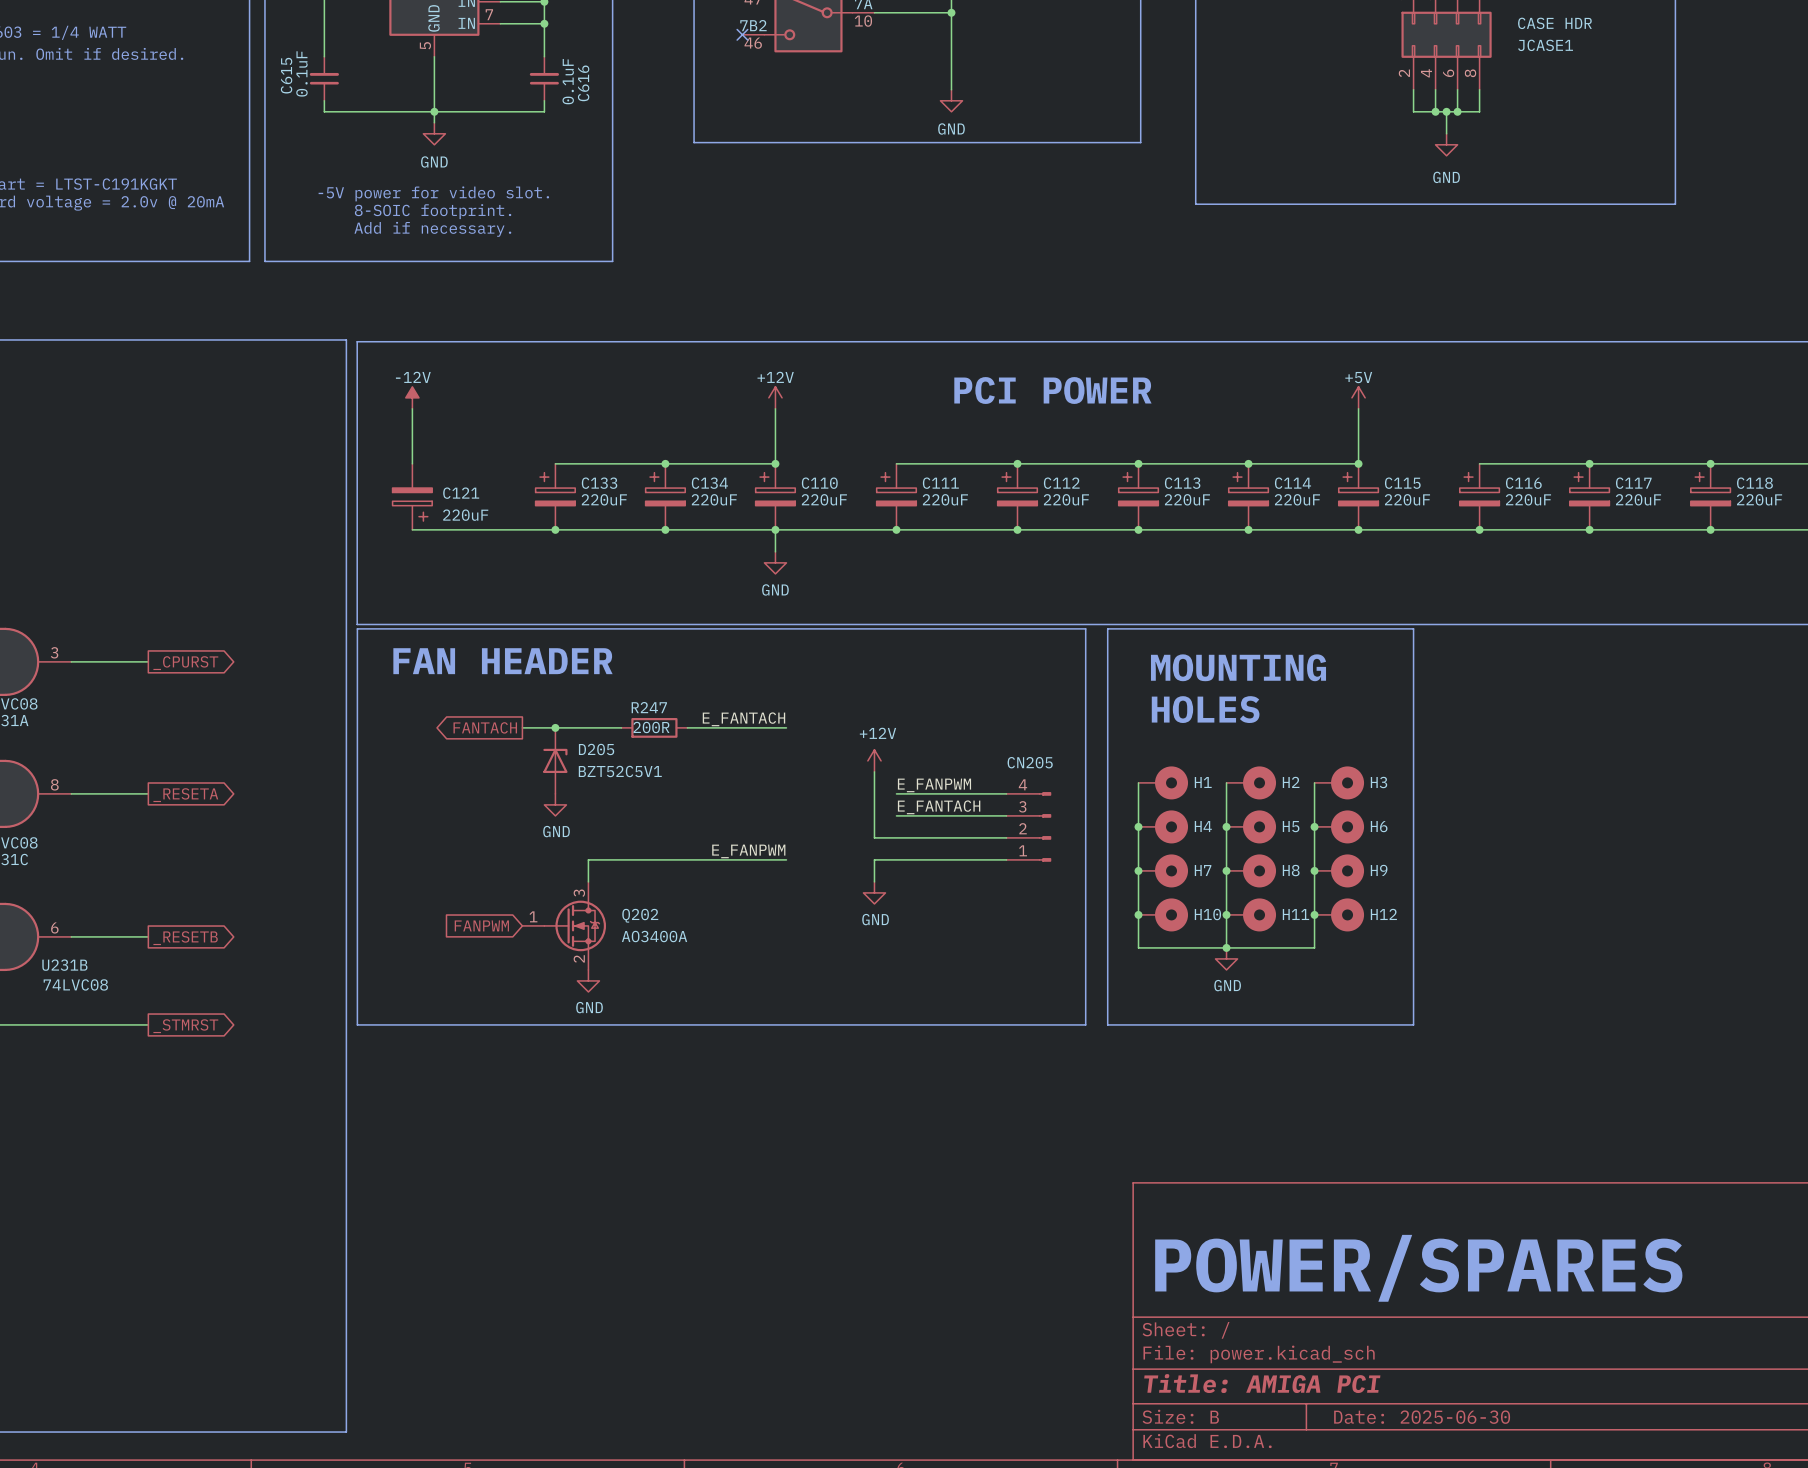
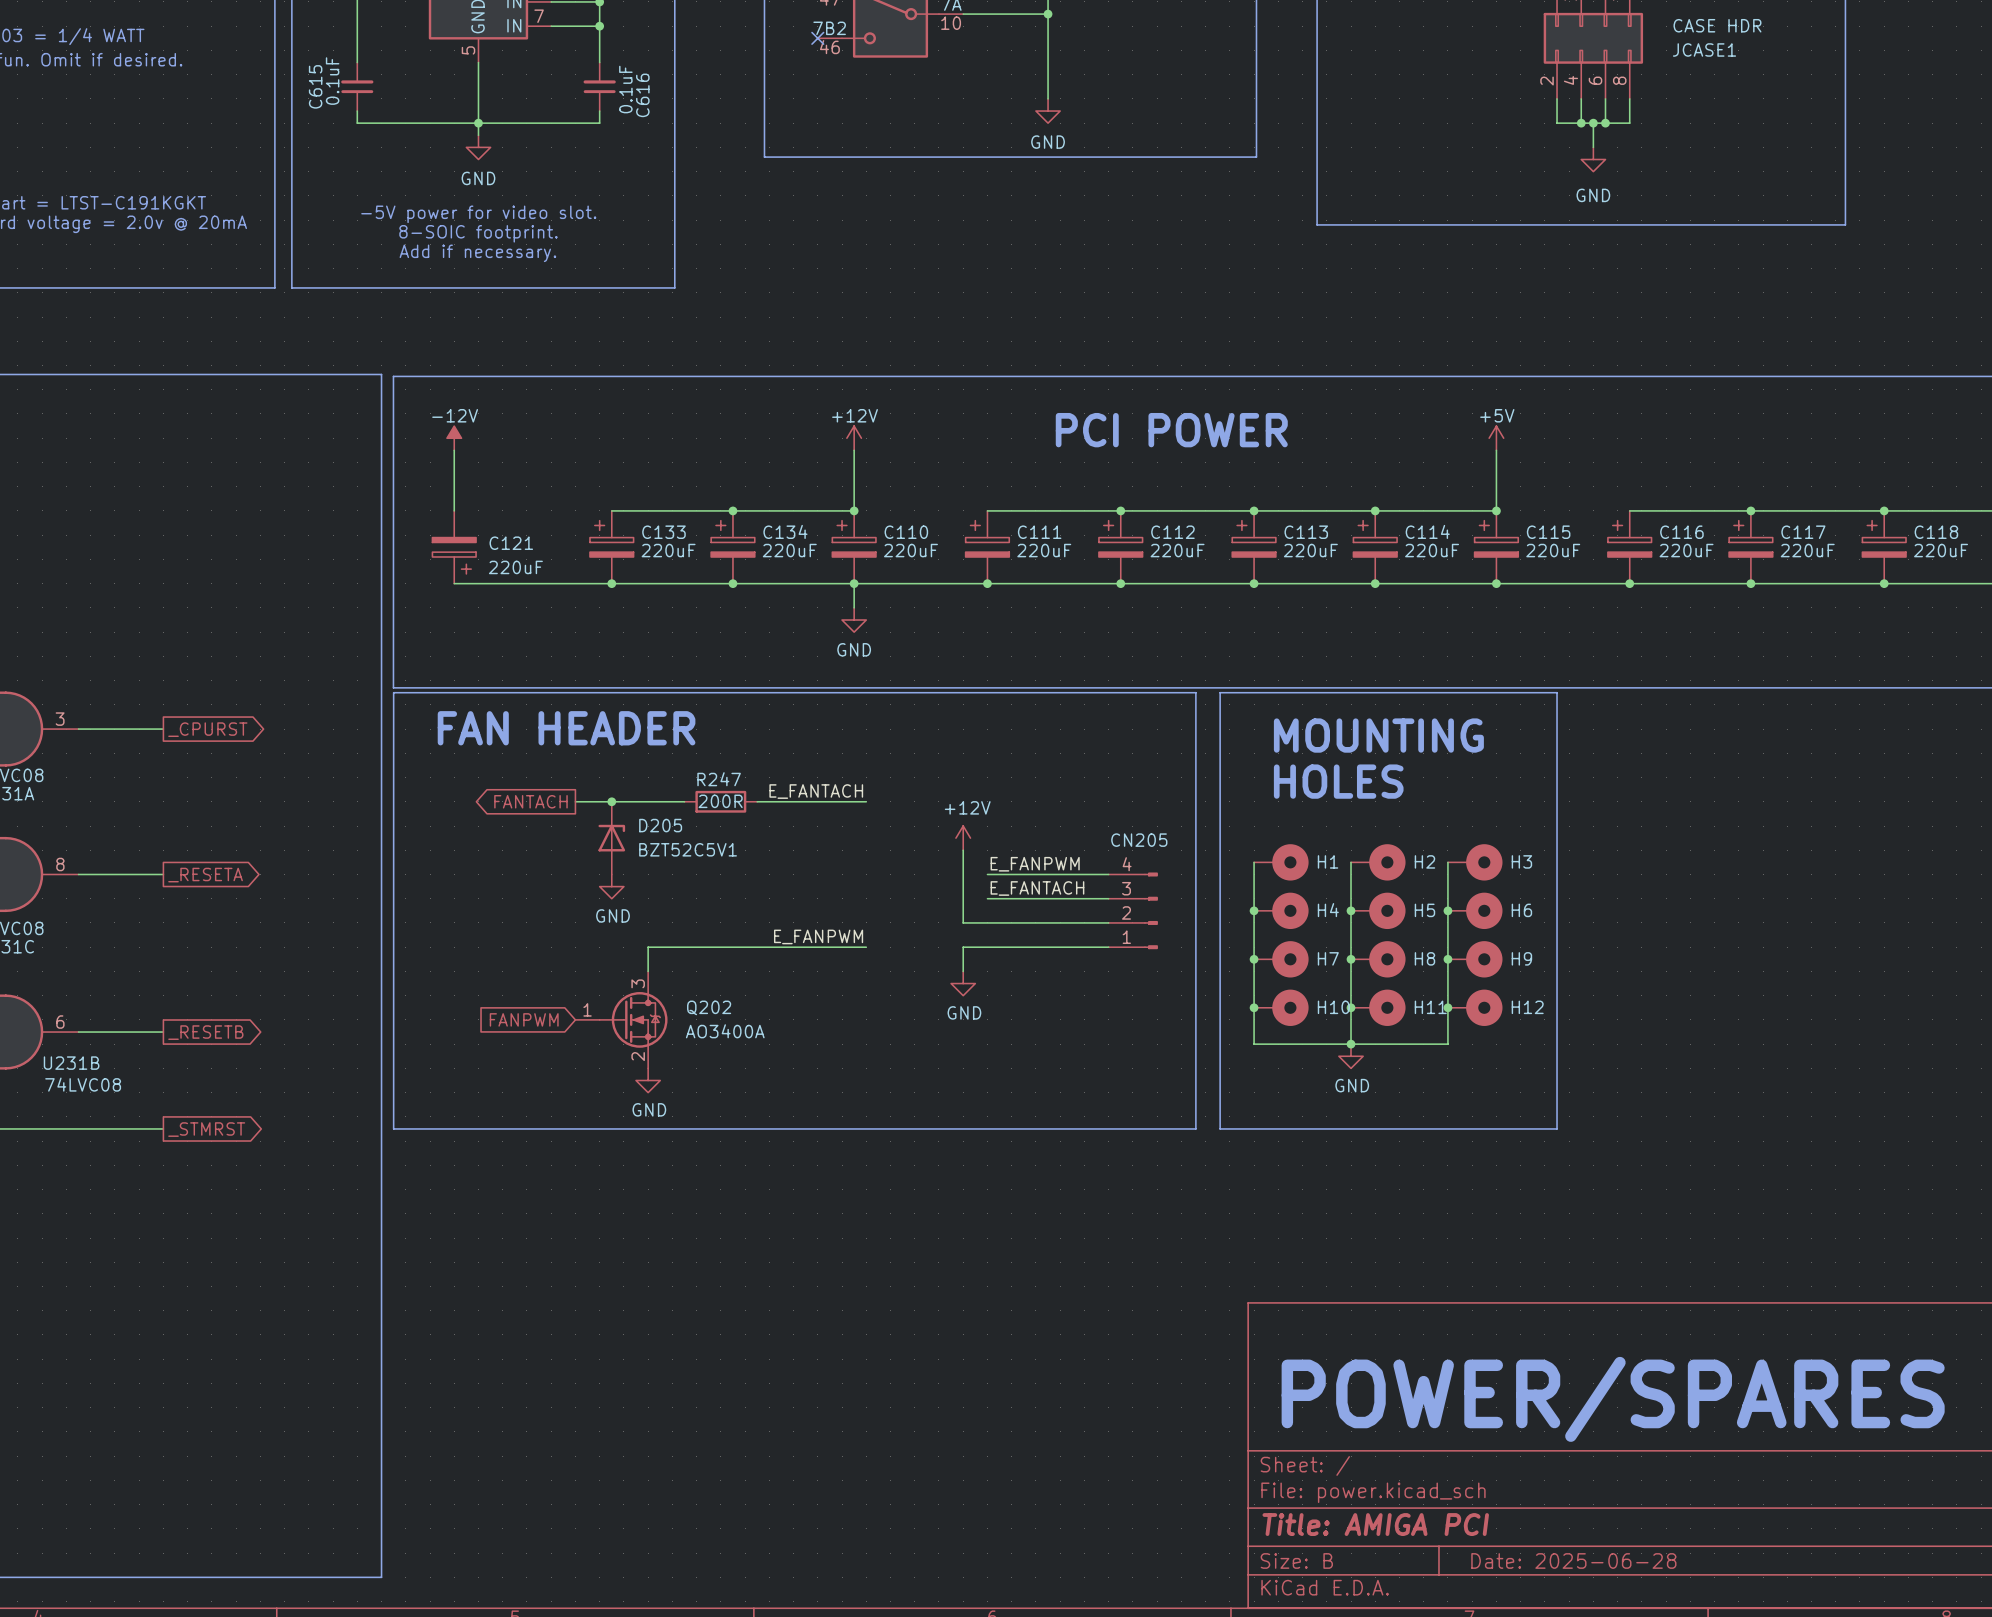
title block: Date: 2025-06-30 (1422, 1417) -> Date: 2025-06-28 (1573, 1560)

